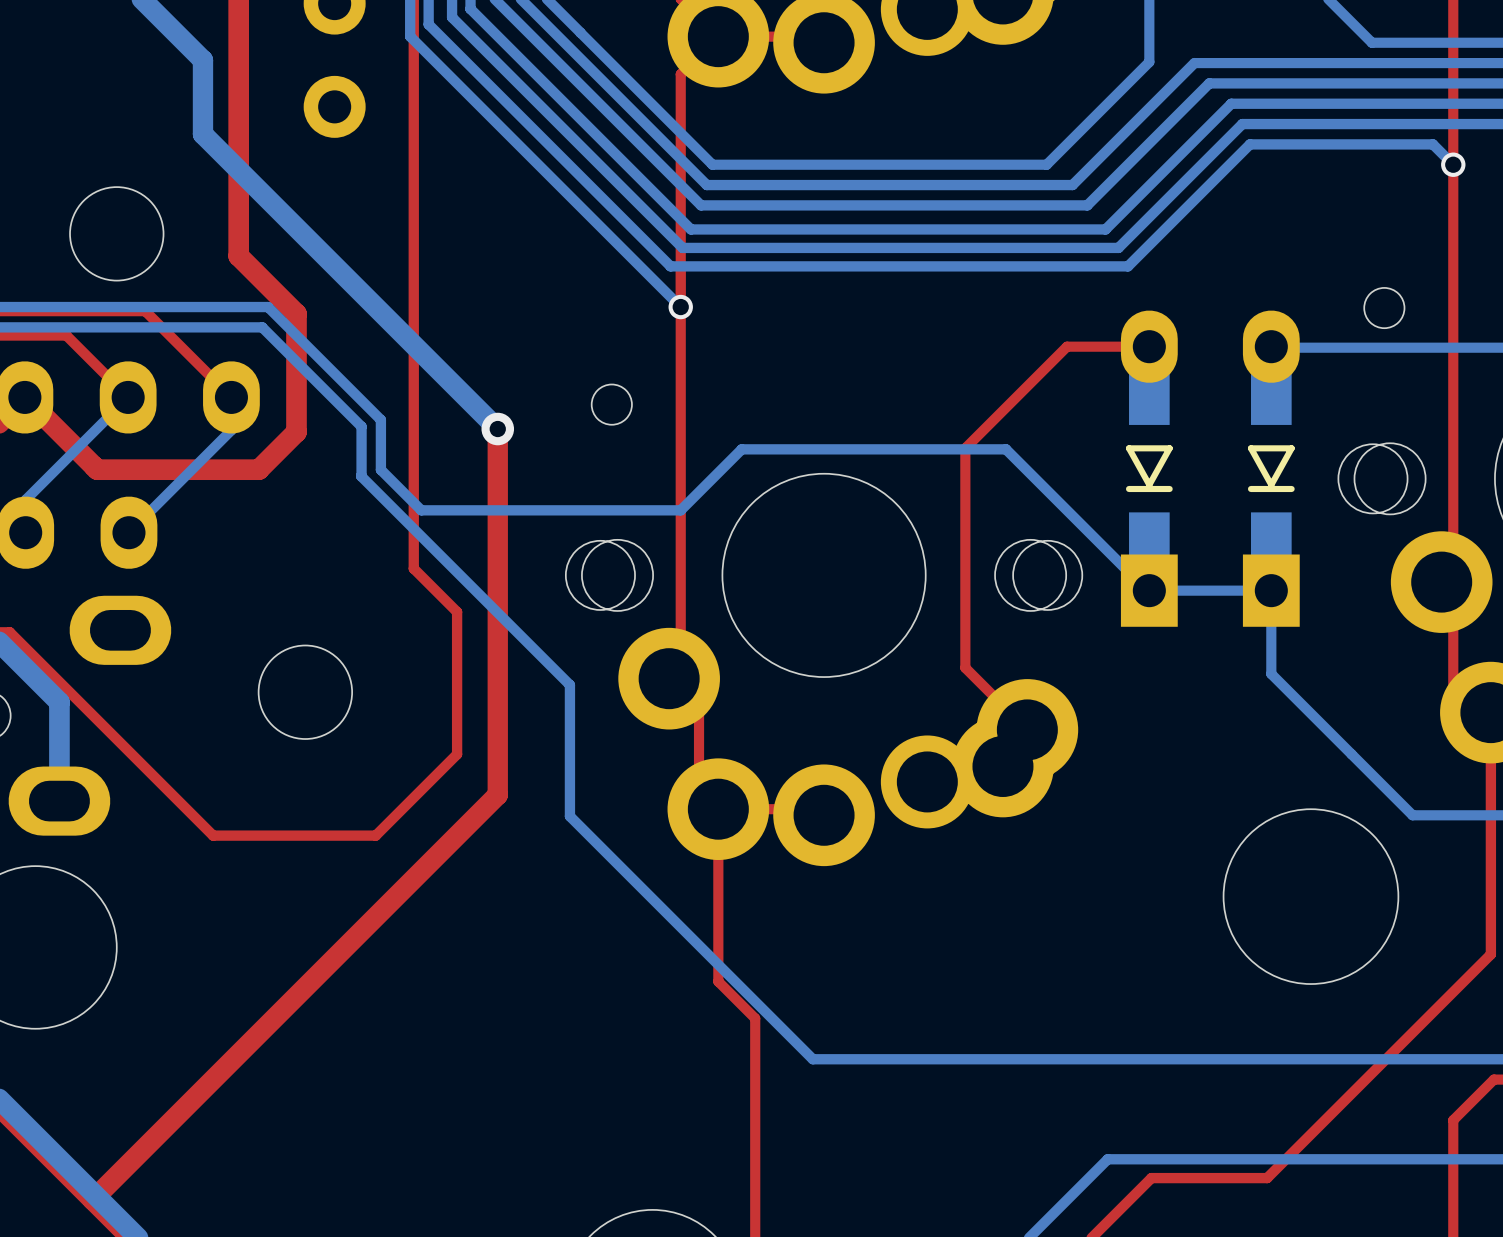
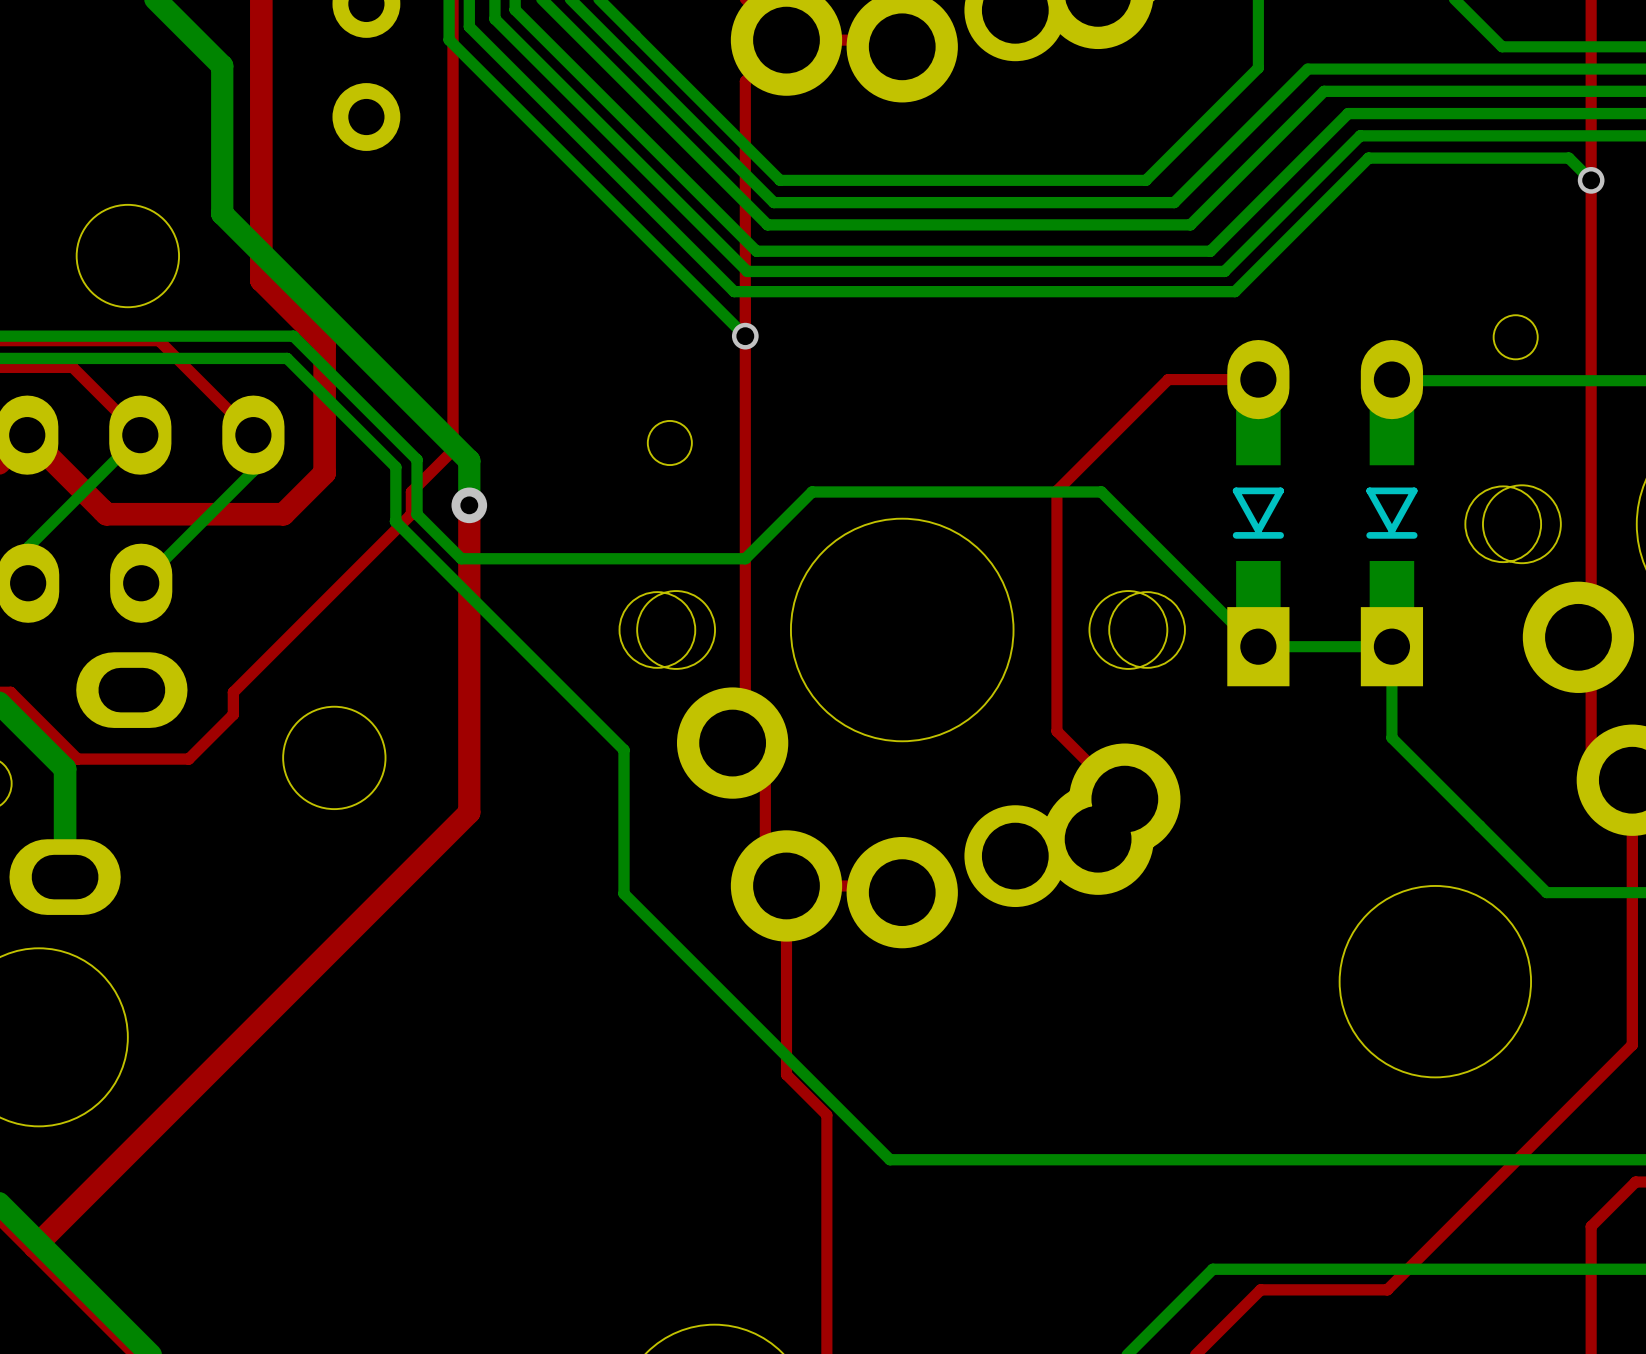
bottom track: (202, 134) (497, 429) -> (222, 146) (222, 213) (469, 460) (469, 505)
top track: (413, 411) (413, 568) (457, 611) (457, 754) (375, 835) (213, 835) (70, 693) -> (453, 450) (411, 491) (411, 514) (233, 692) (233, 714) (188, 759) (77, 759)
top track: (497, 429) (497, 794) (92, 1199) -> none
via position: (497, 429) -> (469, 505)
top track: none -> (469, 505) (469, 812) (34, 1247)

